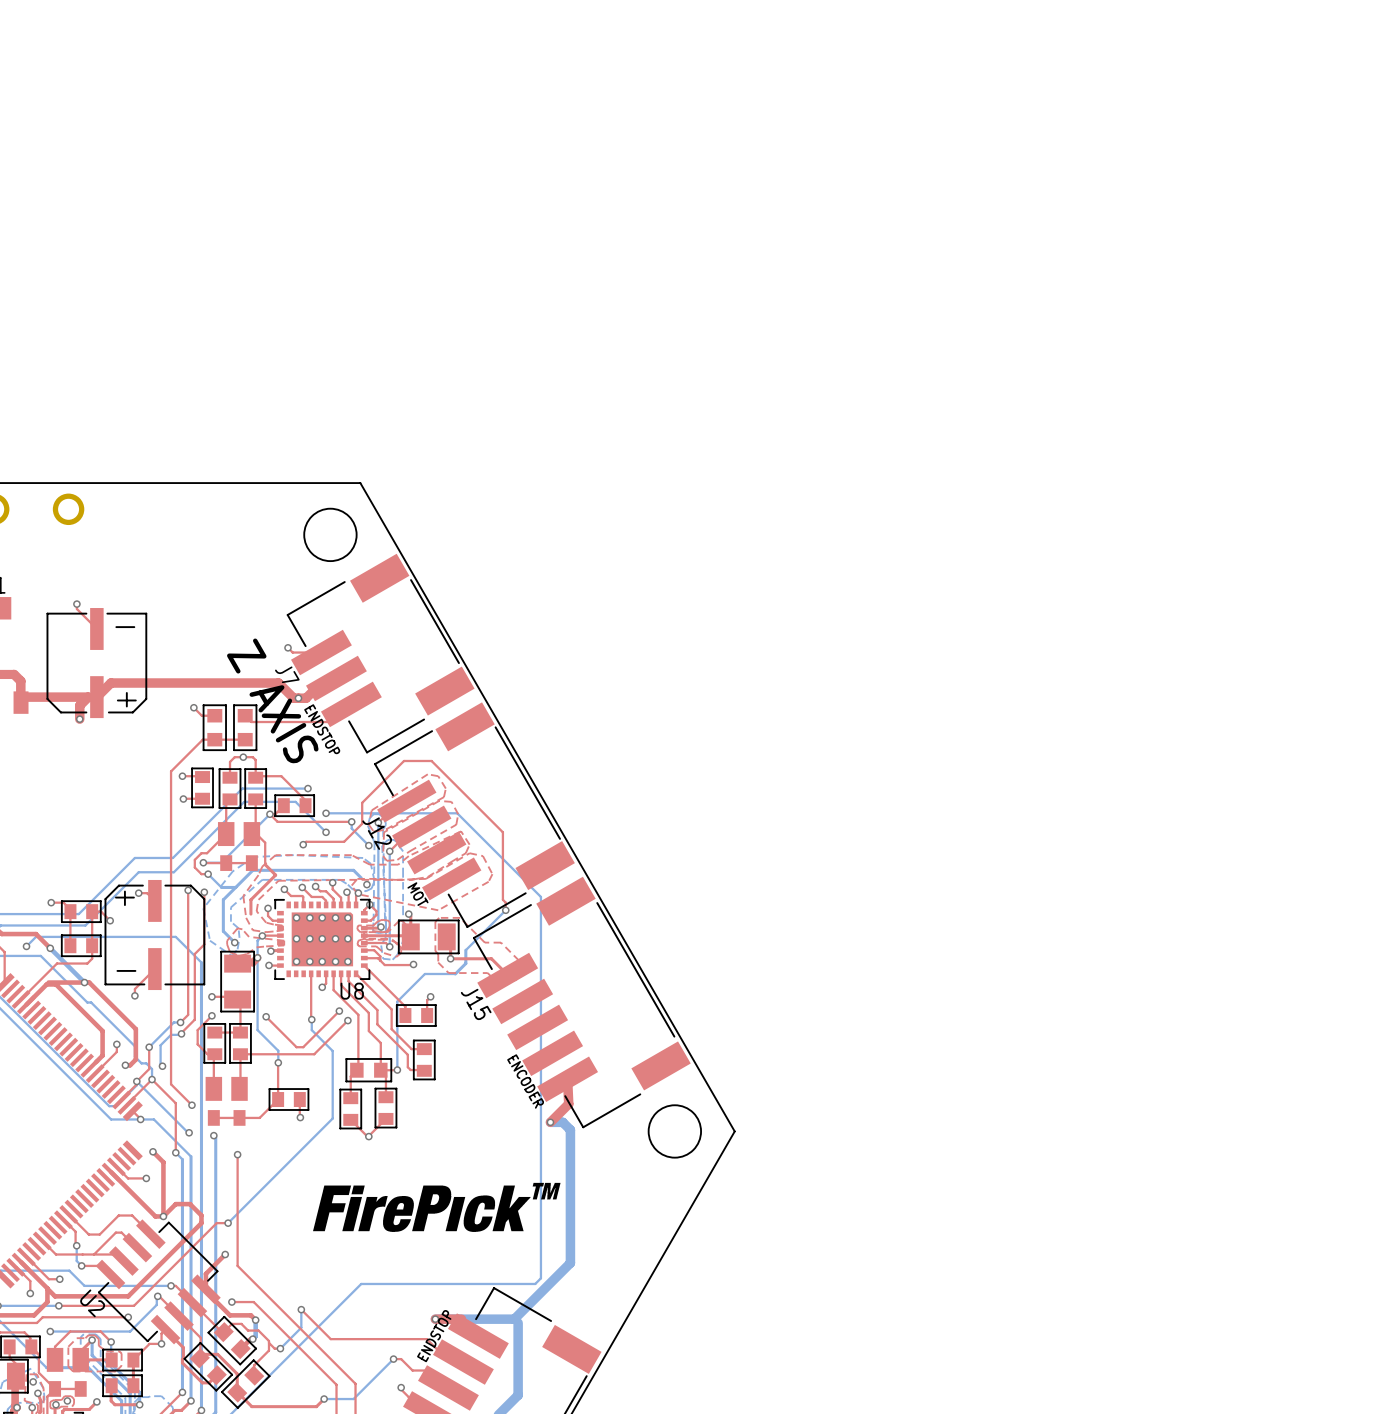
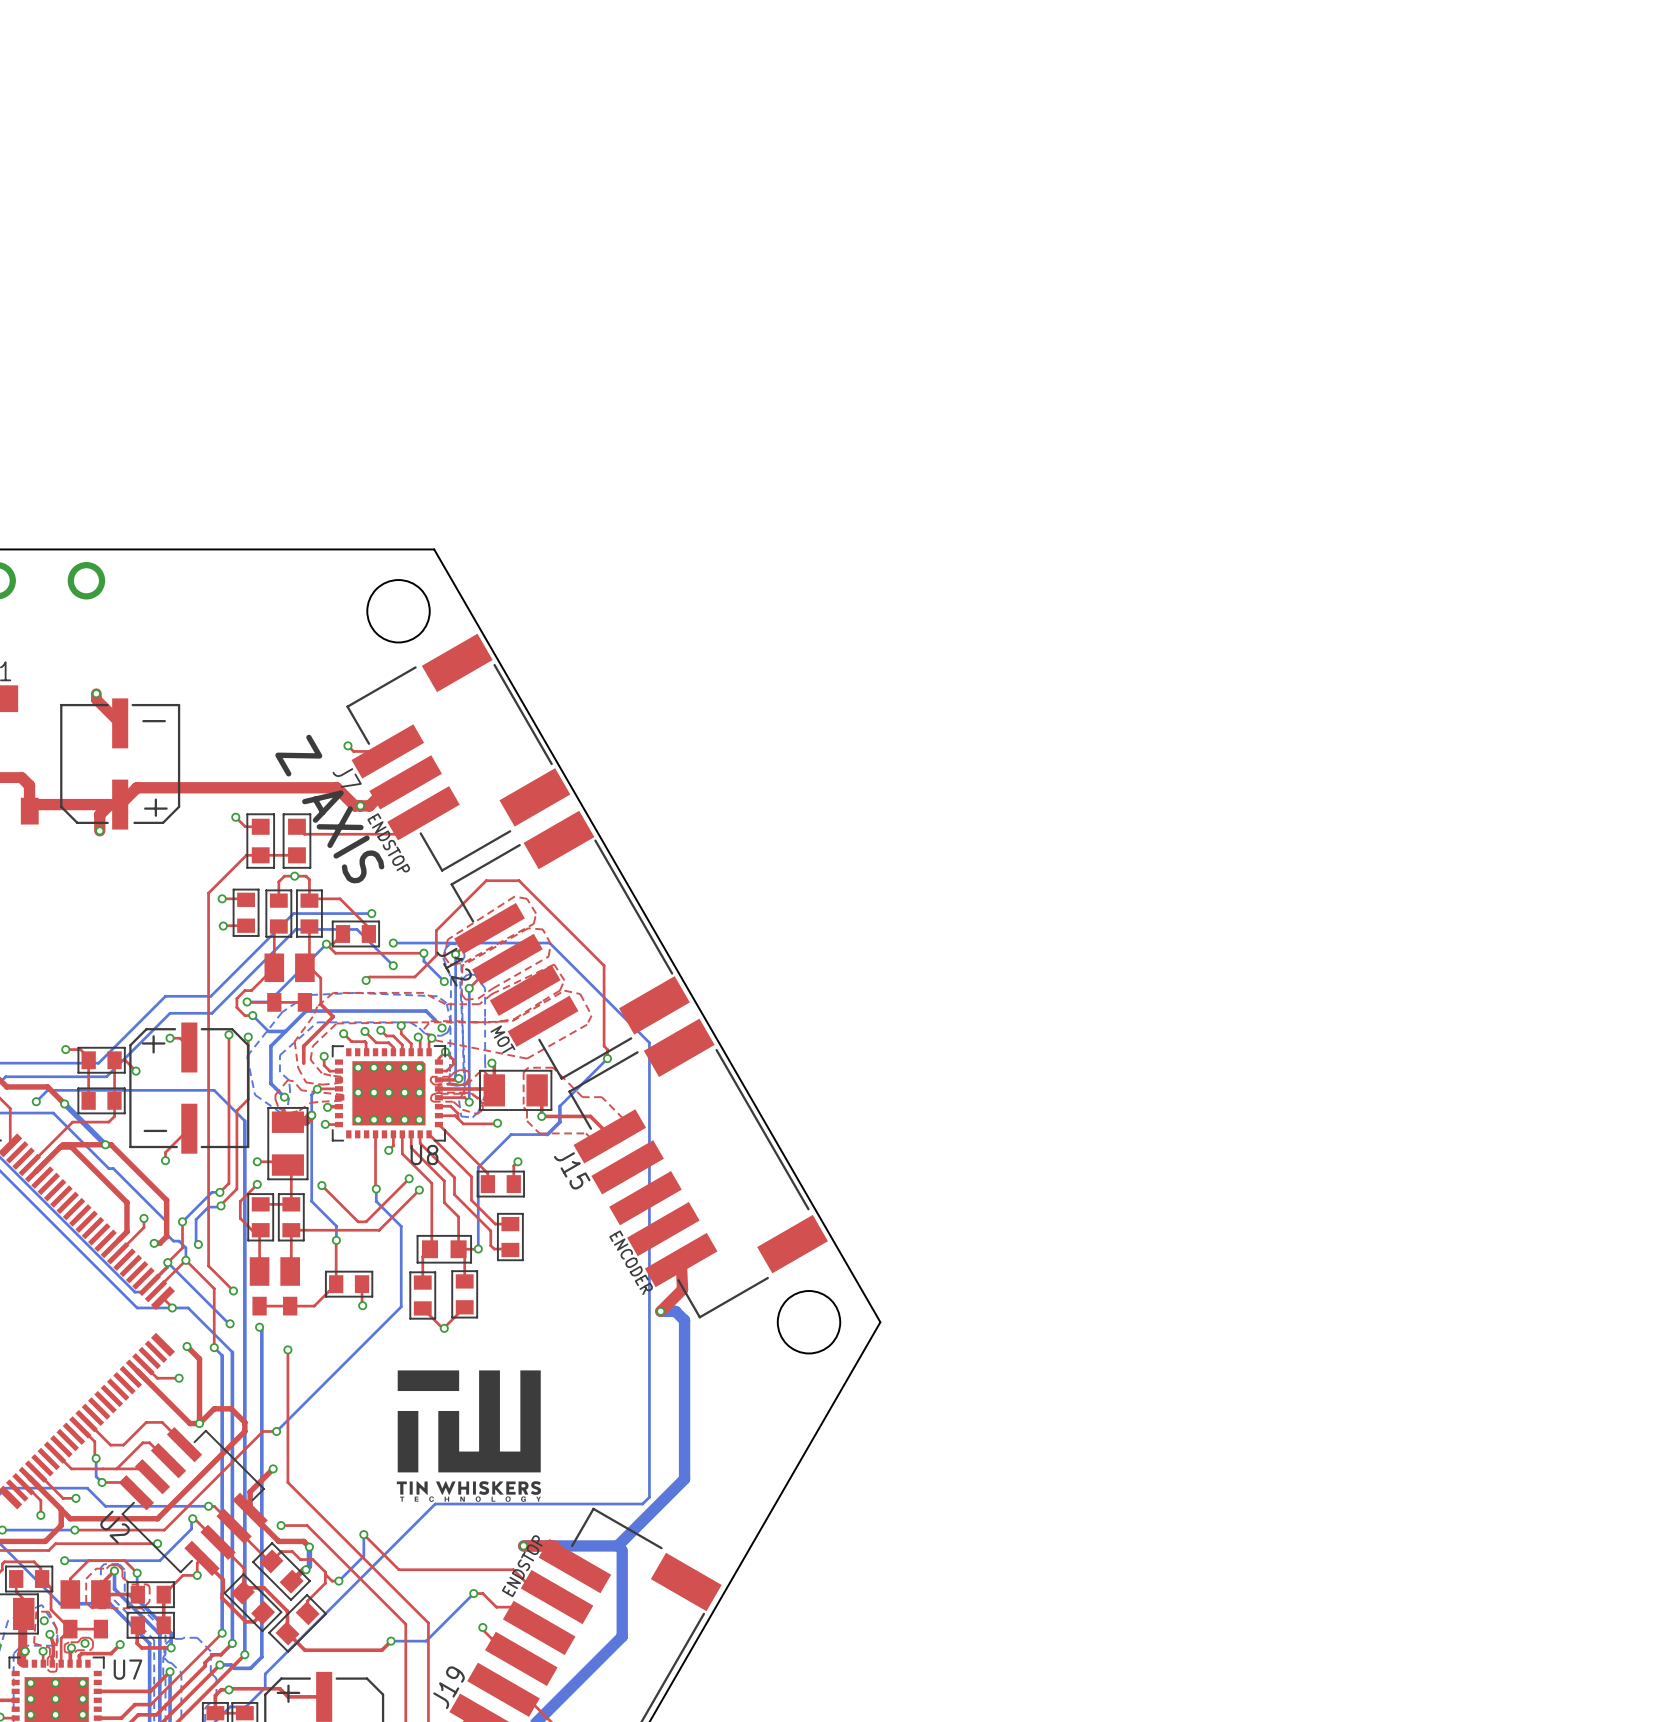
top track width: thin (76, 604) (76, 609) (96, 628) -> thick (96, 693) (96, 699) (120, 723)
drawing: none -> [396, 1370, 541, 1502]
drawing: [313, 1182, 561, 1232] -> none

